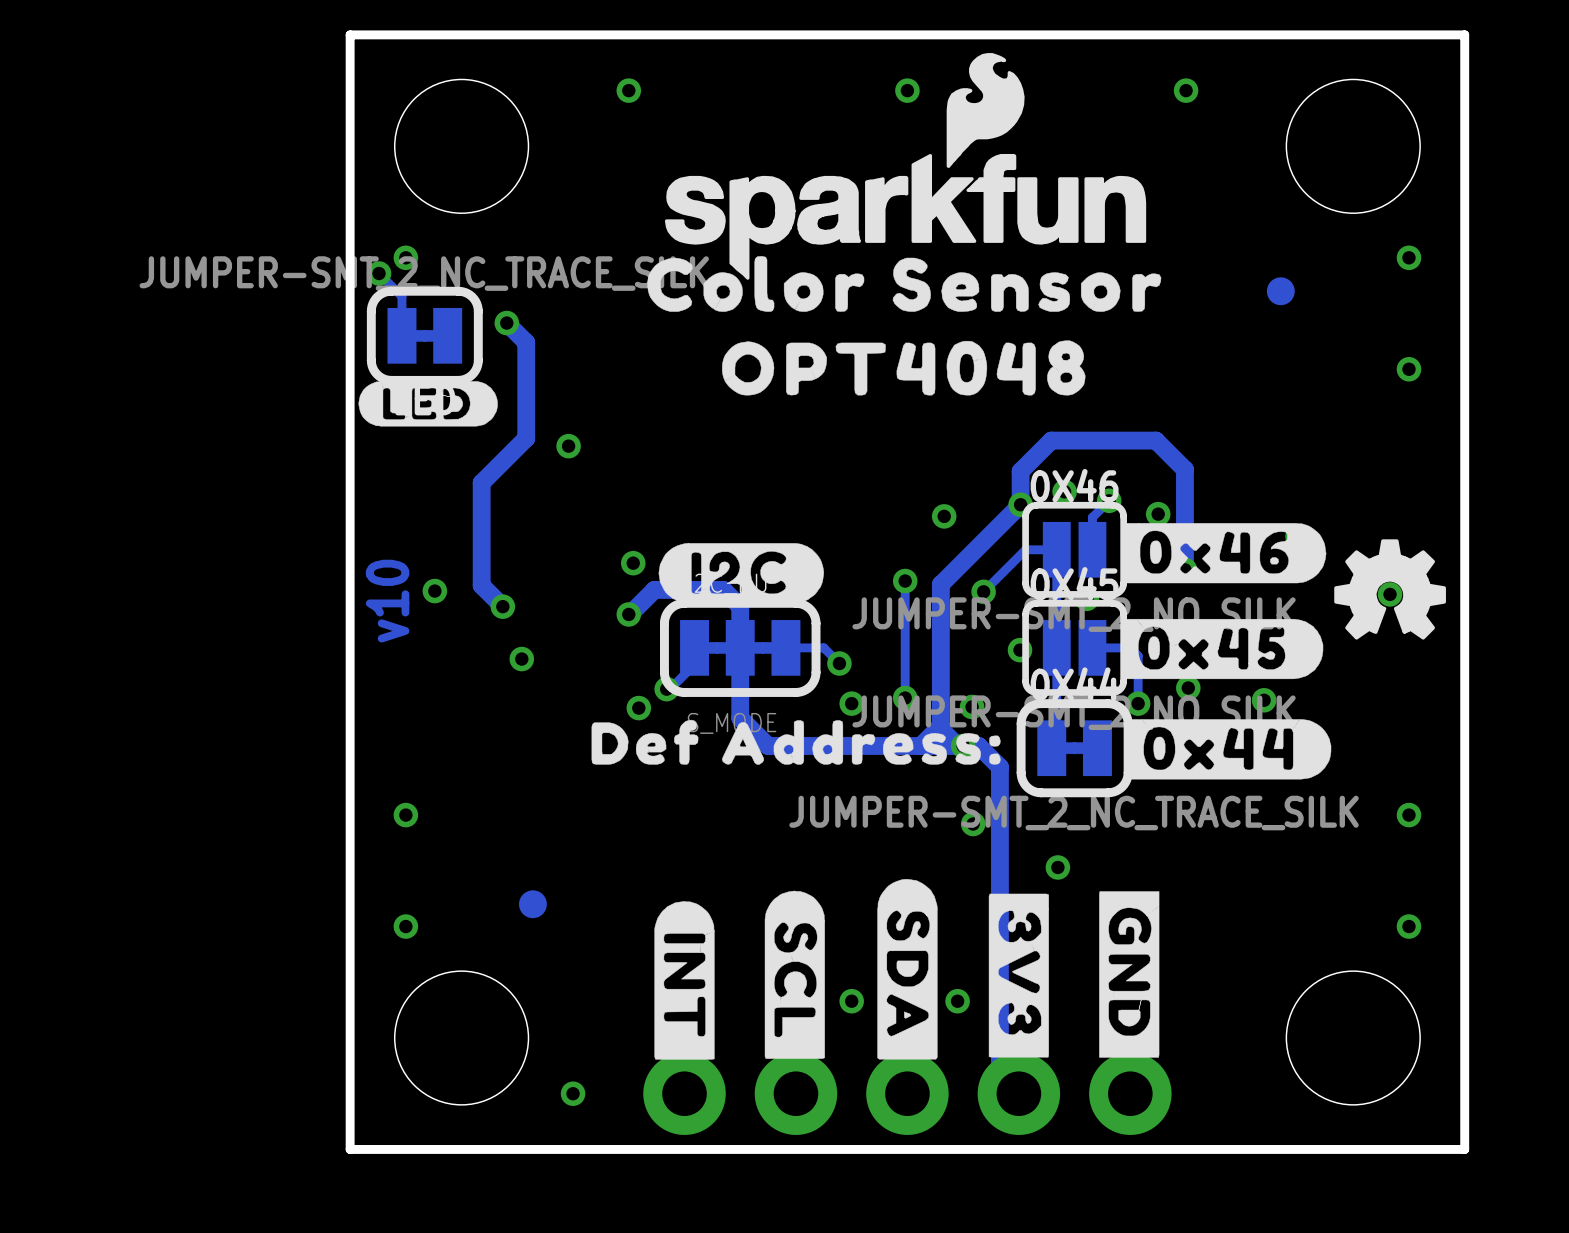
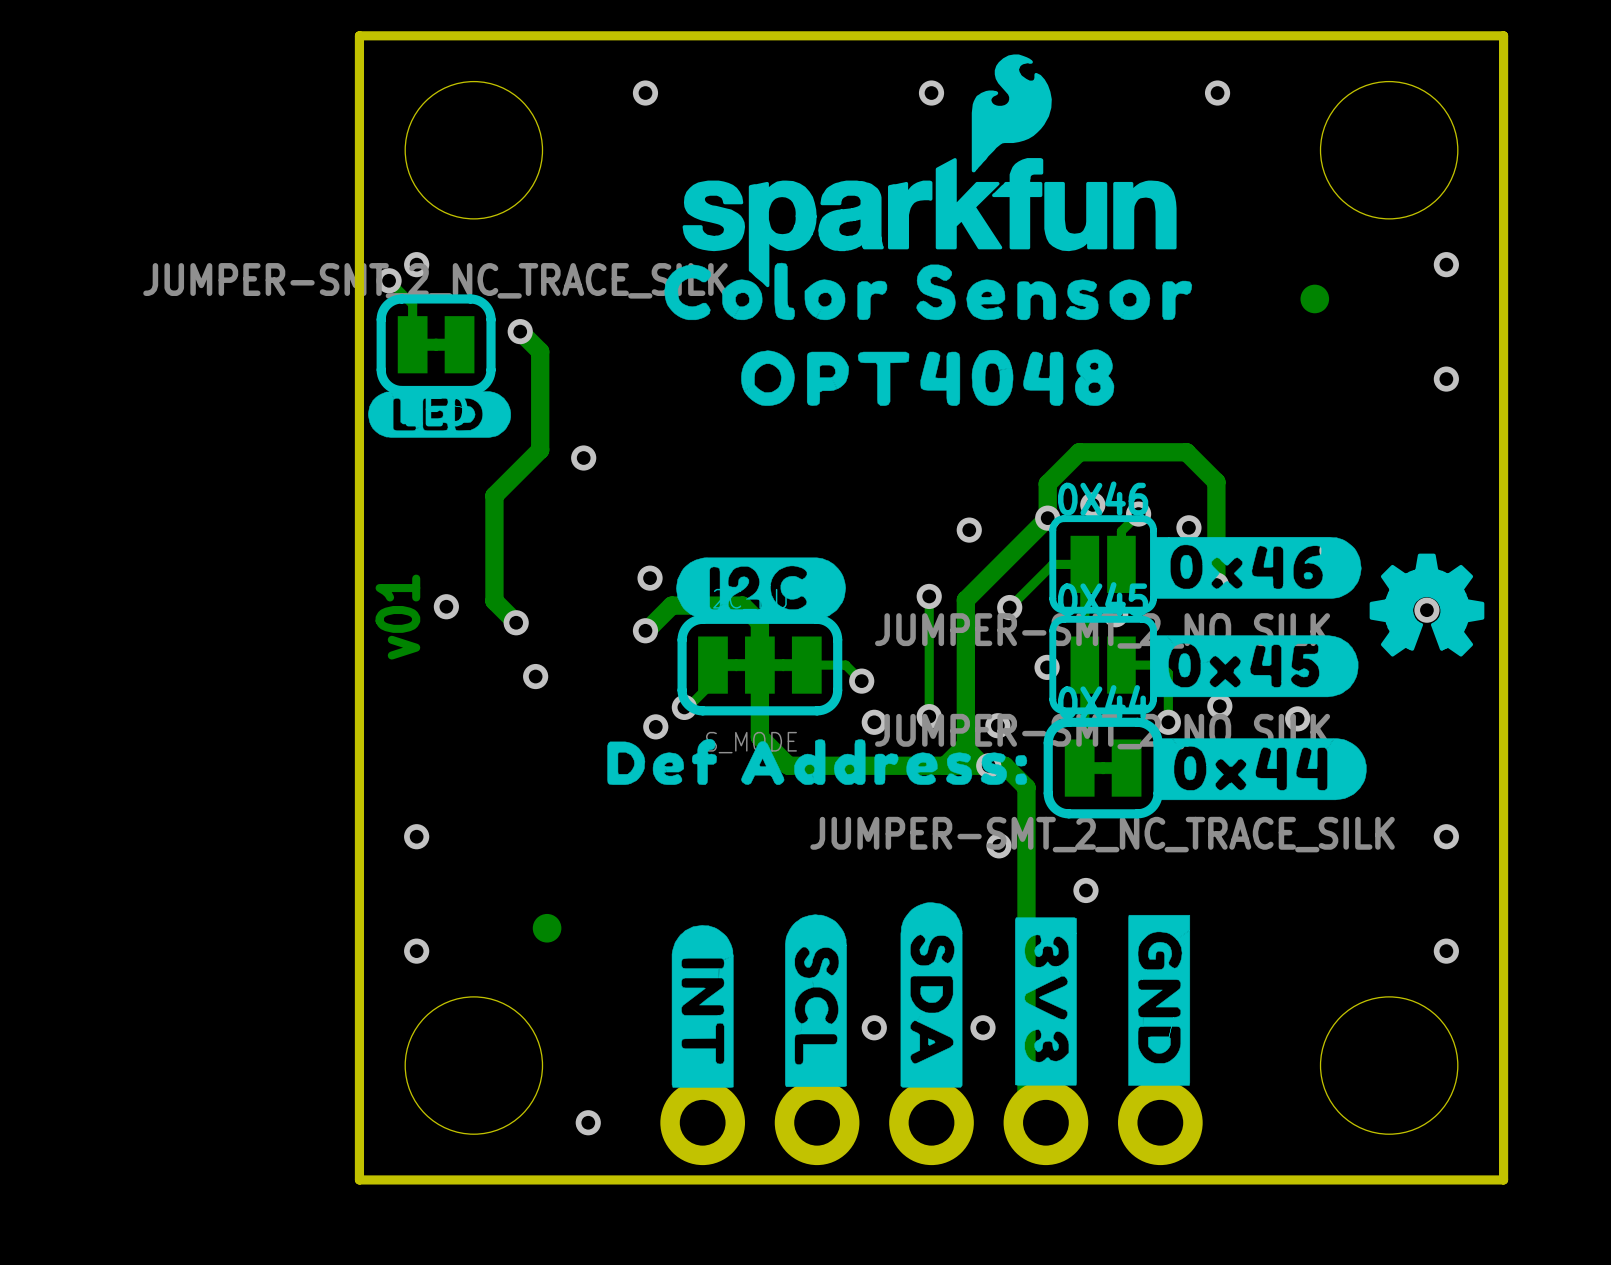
text: v10 (387, 601) -> v01 (397, 617)

